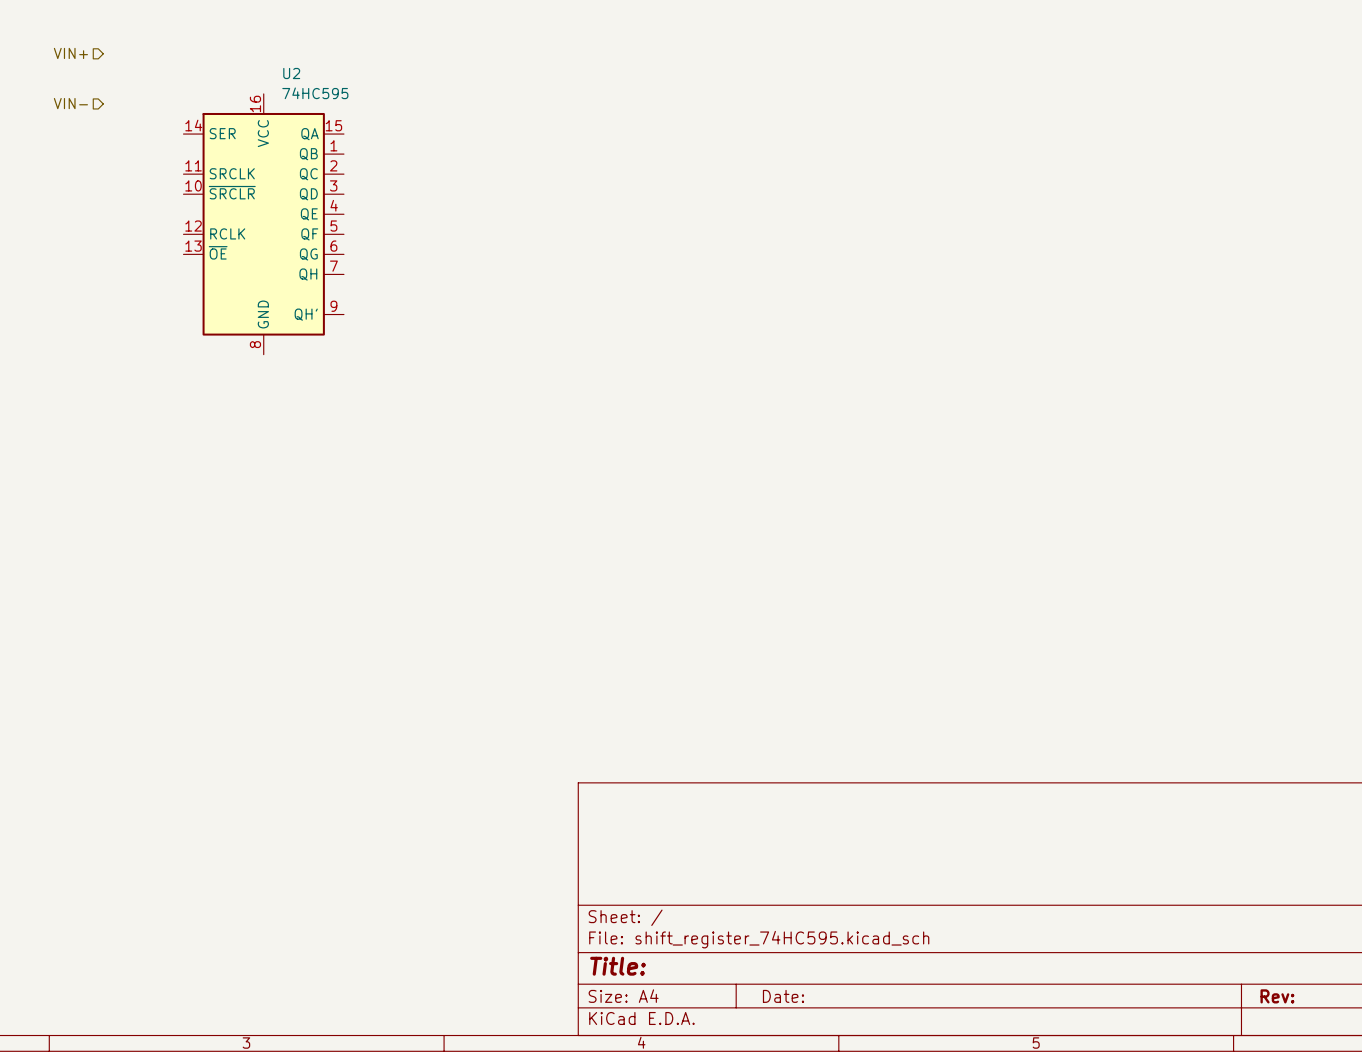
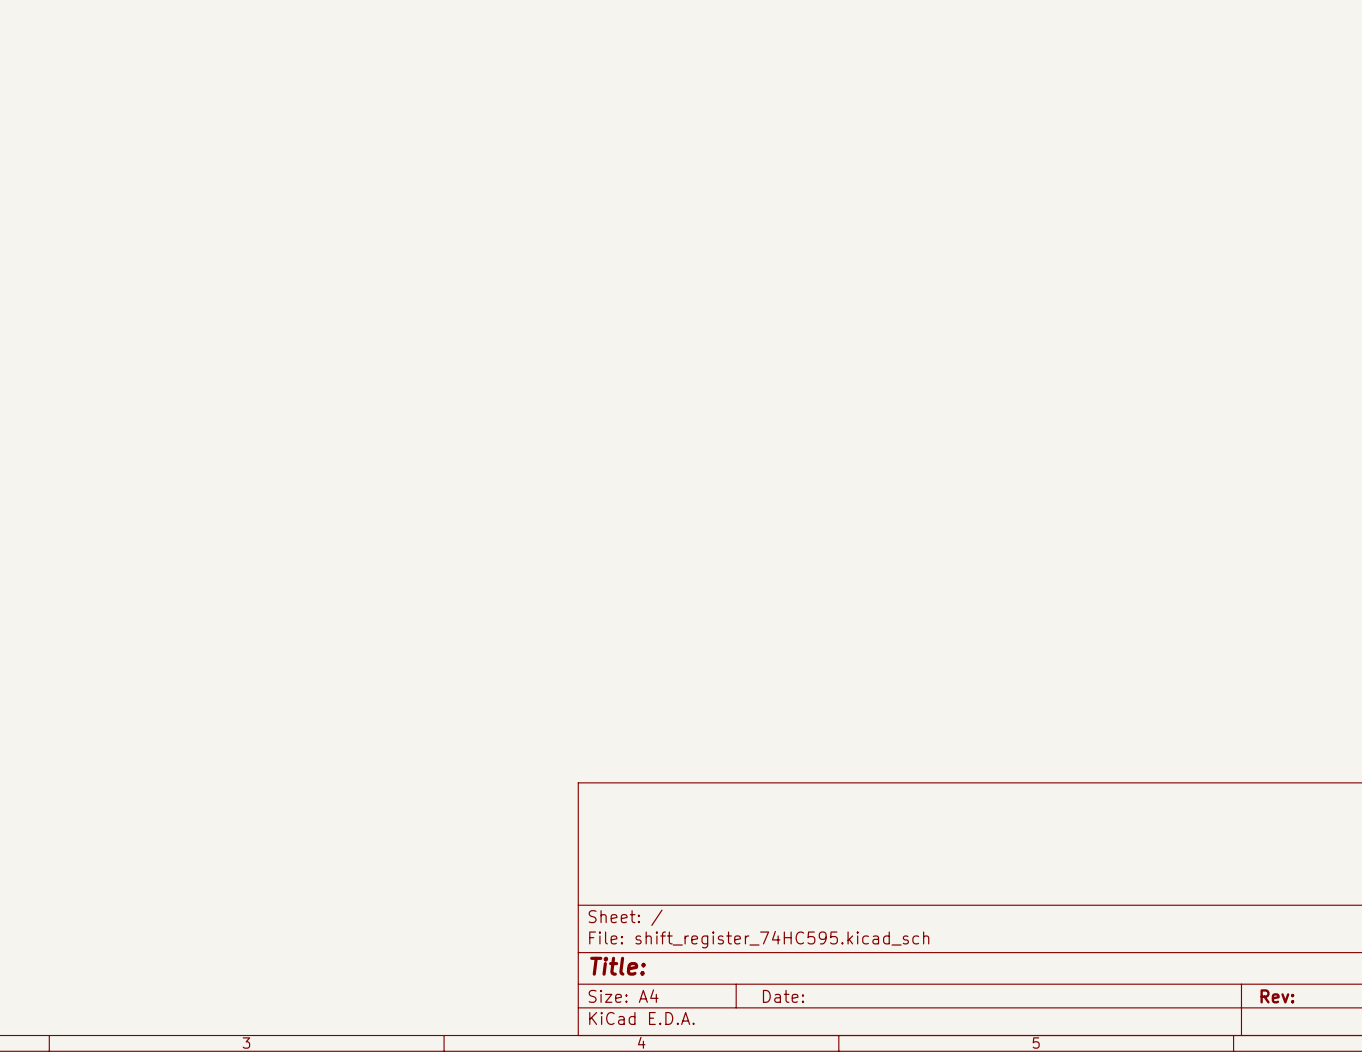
hierarchical label: VIN+ (70, 53) -> none
hierarchical label: VIN- (70, 103) -> none
U2: 74HC595 (263, 224) -> none

